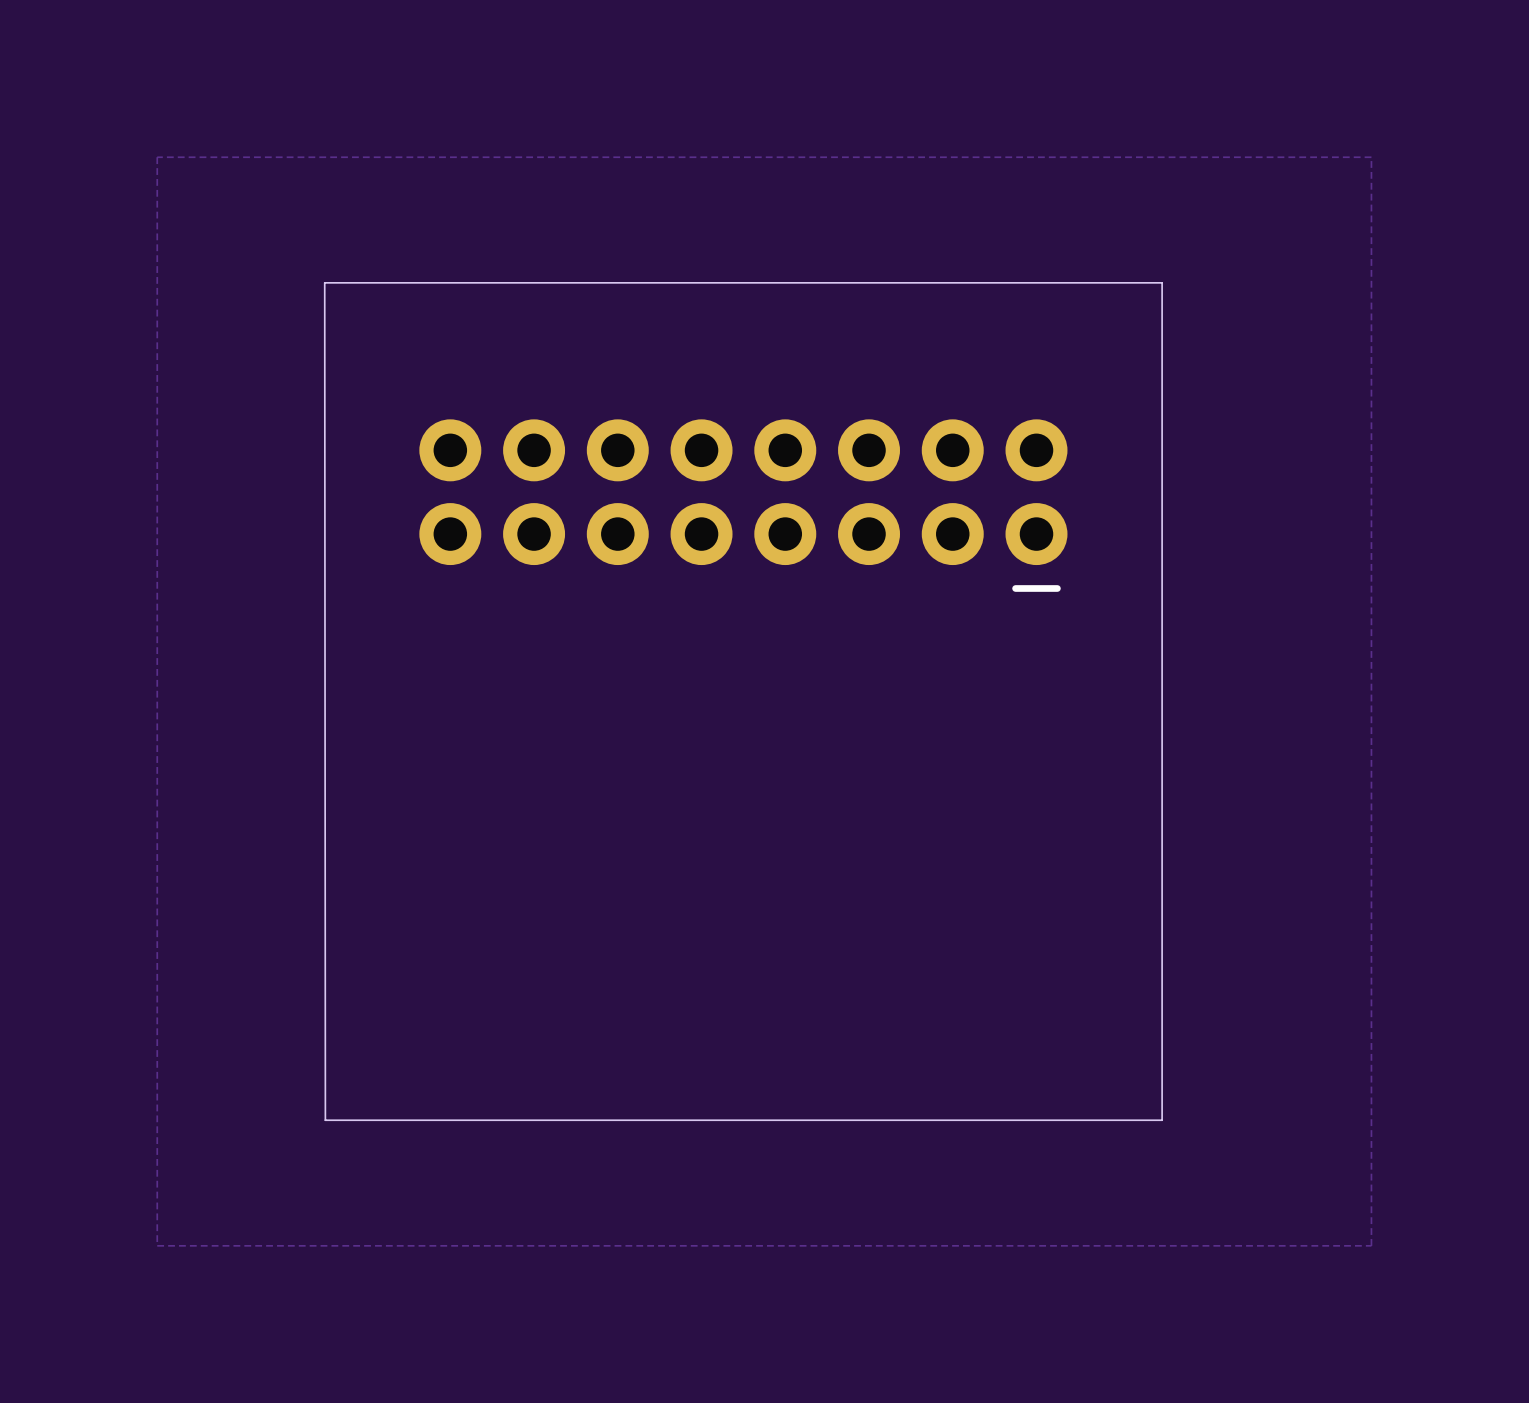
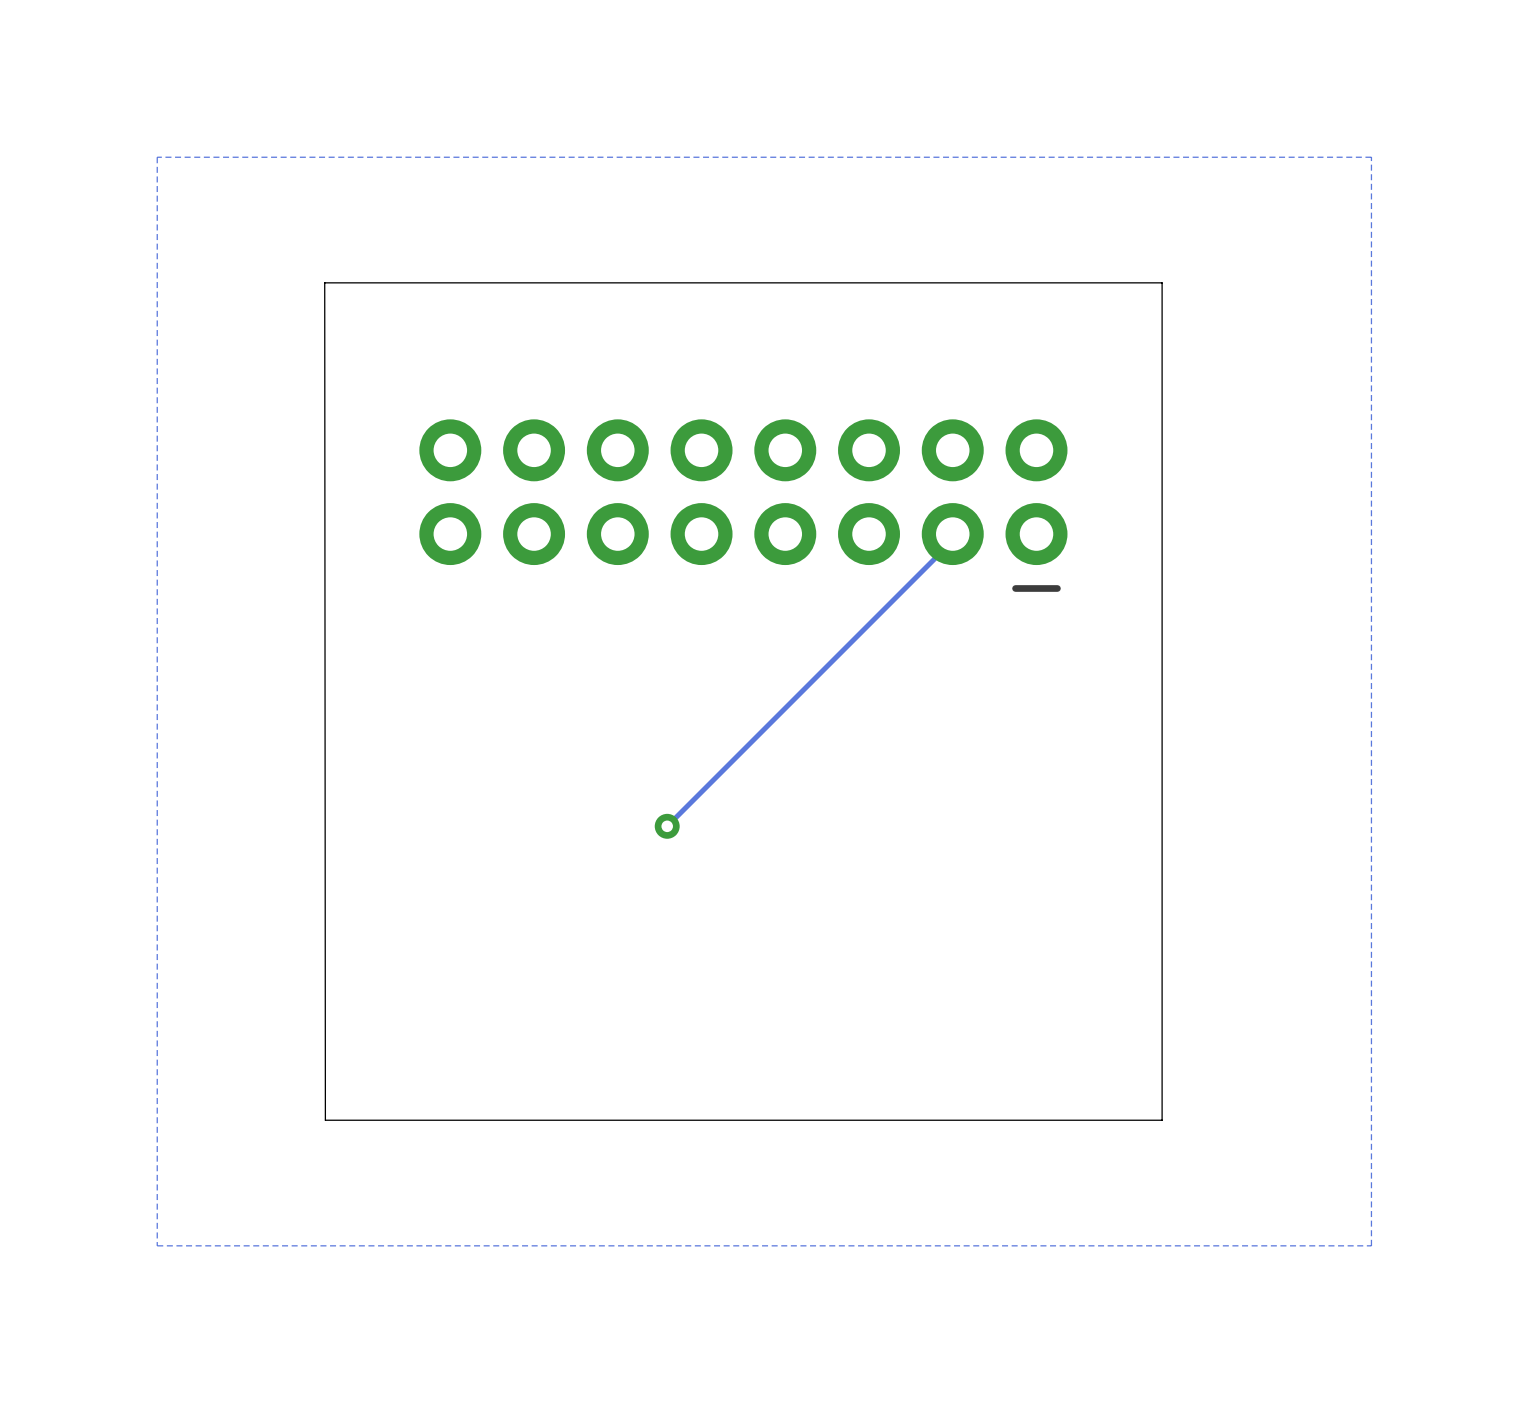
track: none -> (952, 534) (951, 542) (667, 826)
via: none -> (667, 826)

